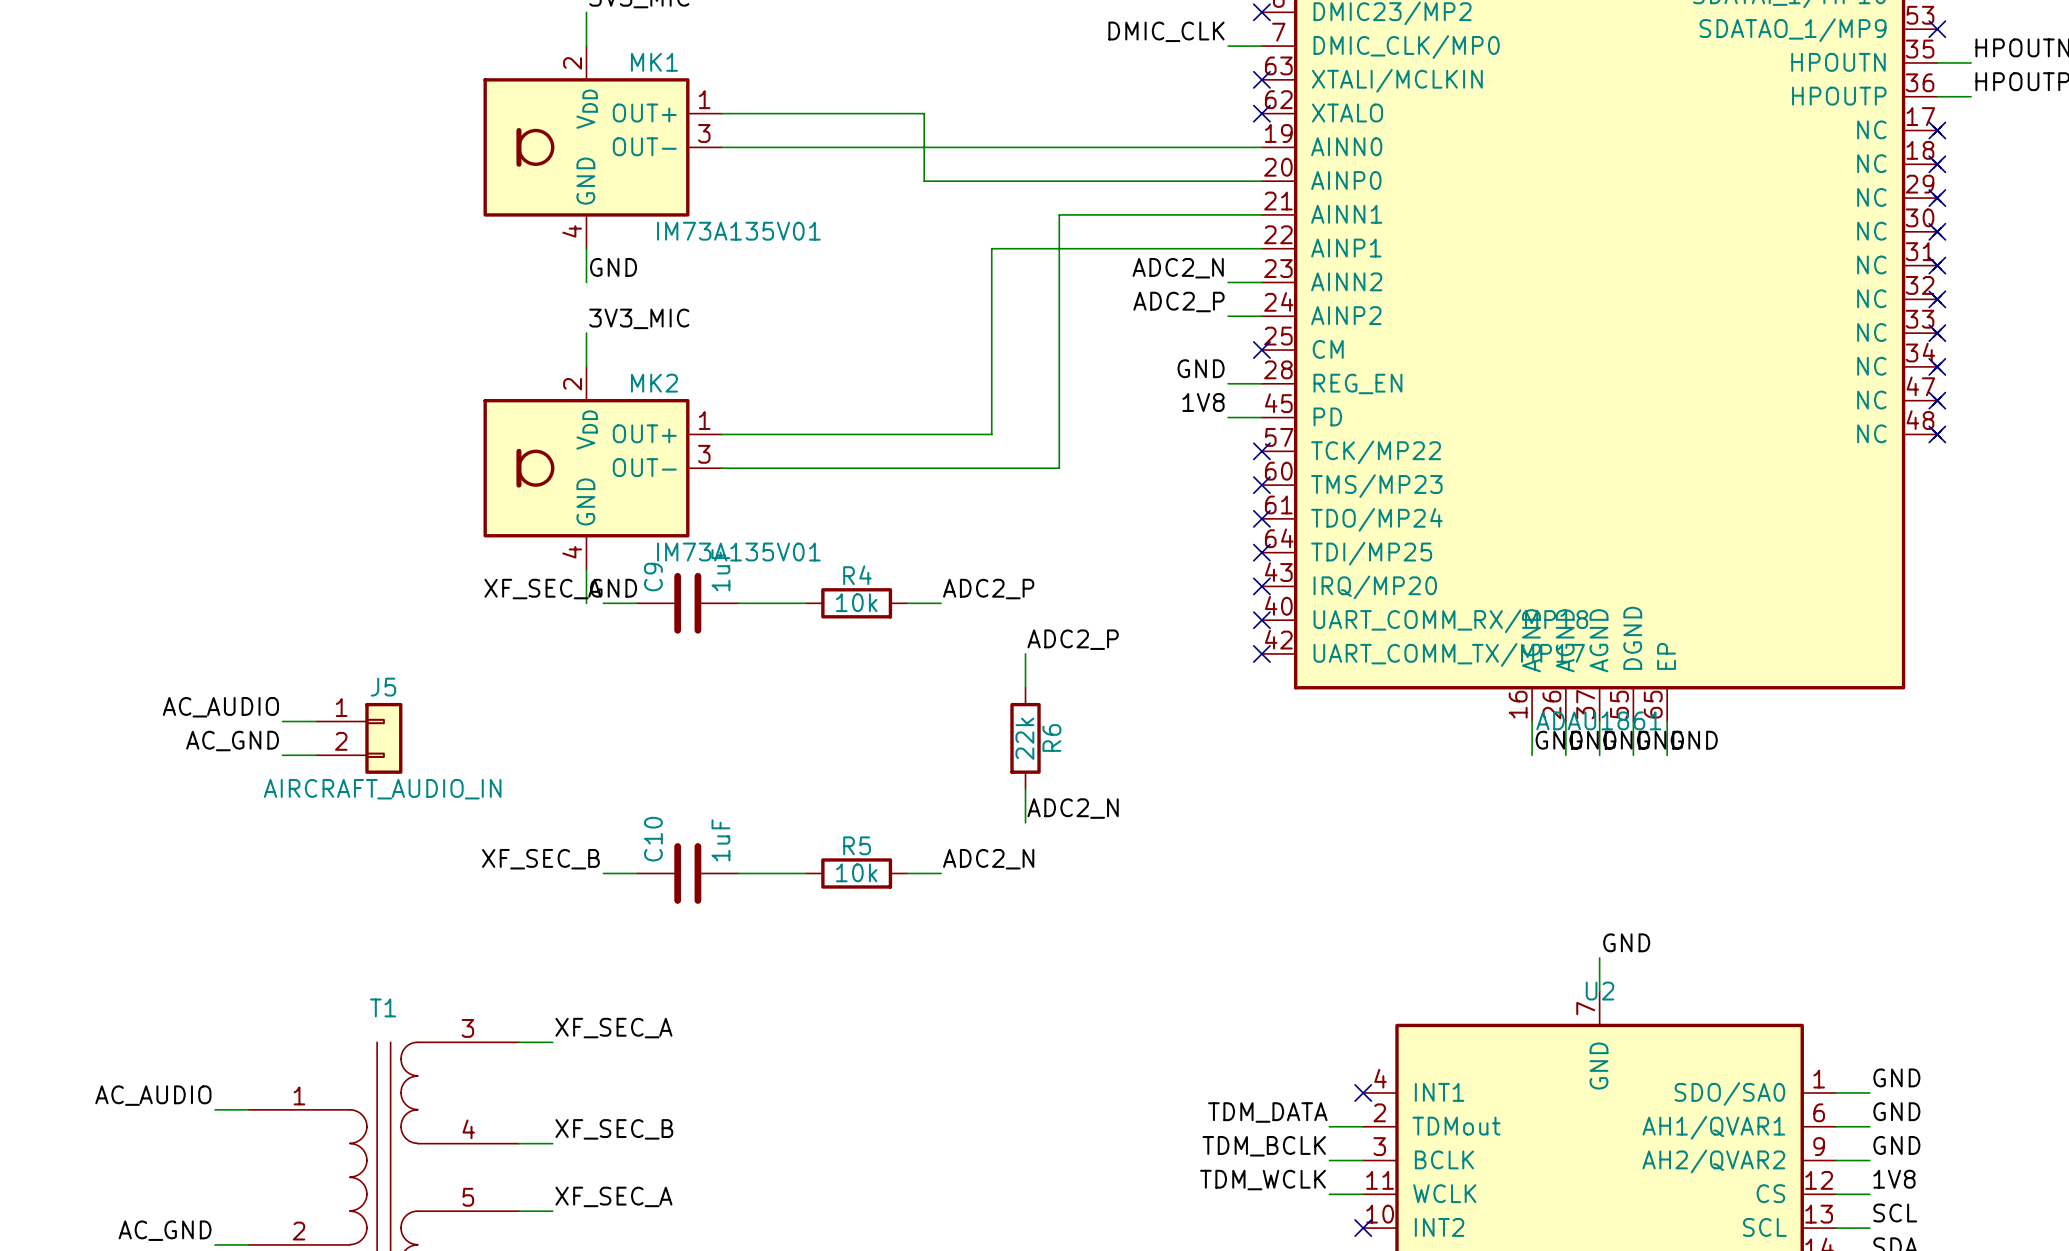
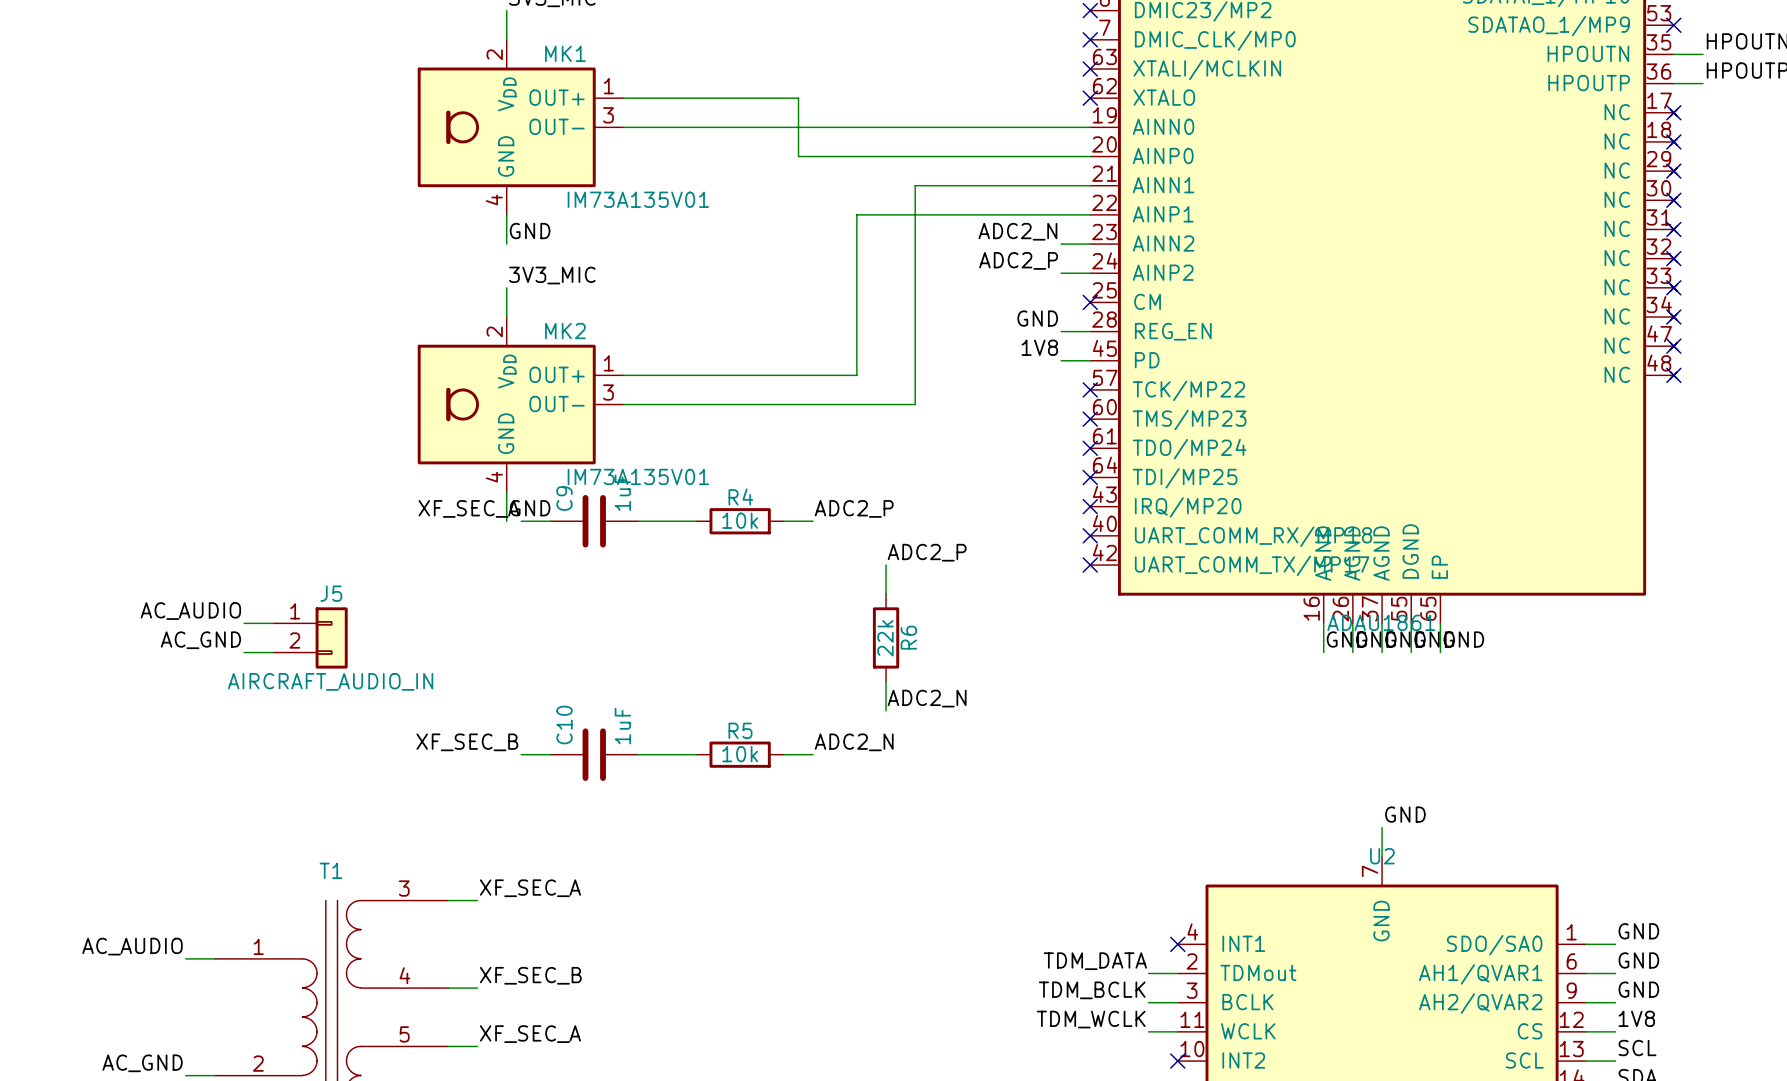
label: DMIC_CLK (1166, 31) -> none
wire: (1228, 46) (1261, 46) -> none
no-connect mark: none -> (1090, 39)

